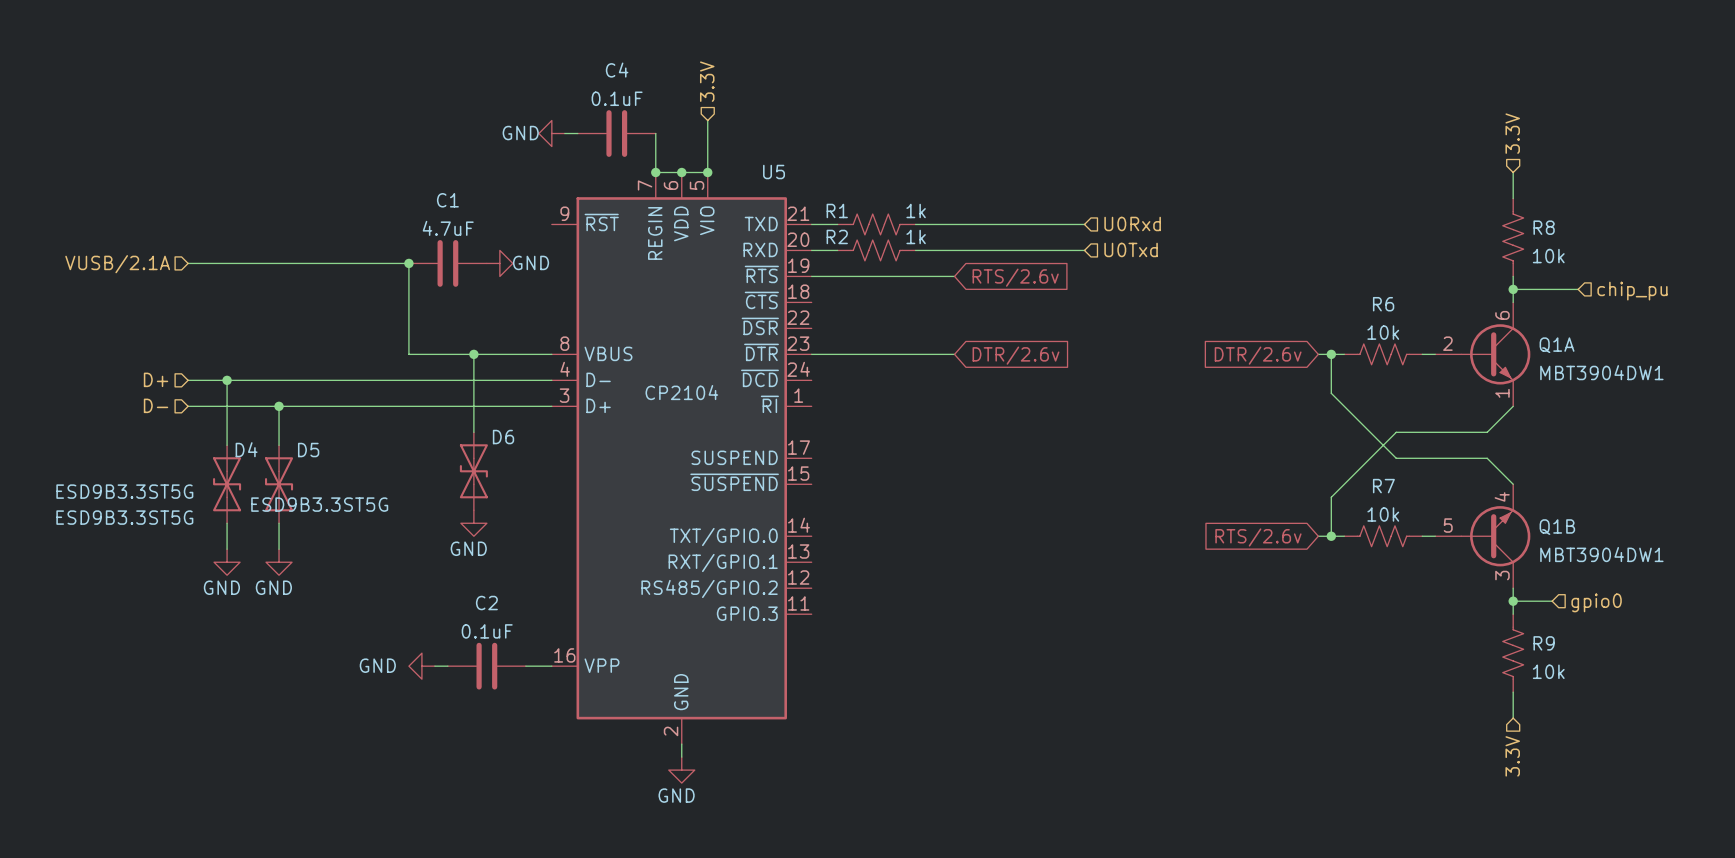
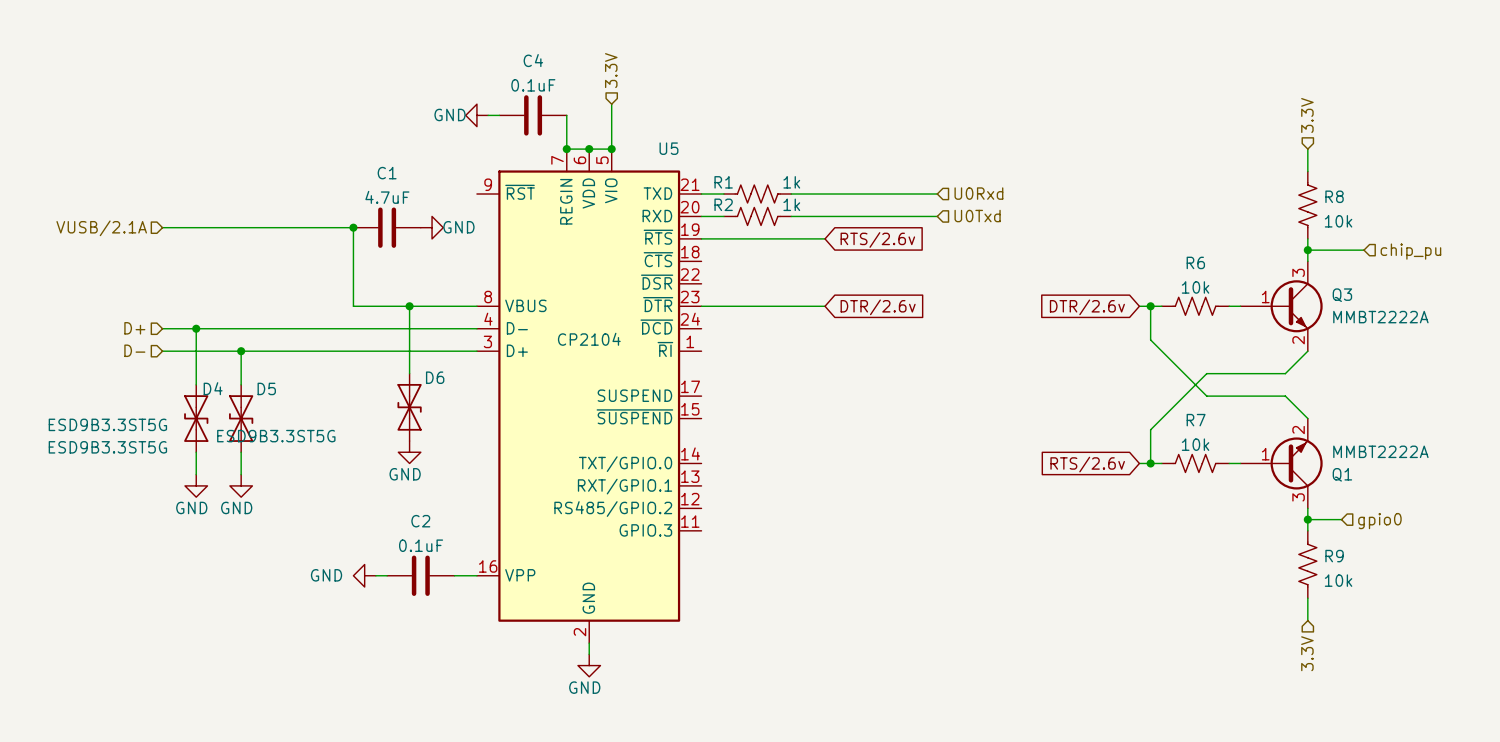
Q1A: MBT3904DW1 (1482, 354) -> none
Q3: none -> MMBT2222A (1281, 306)
Q1B: MBT3904DW1 (1482, 536) -> none
Q1: none -> MMBT2222A (1281, 463)

